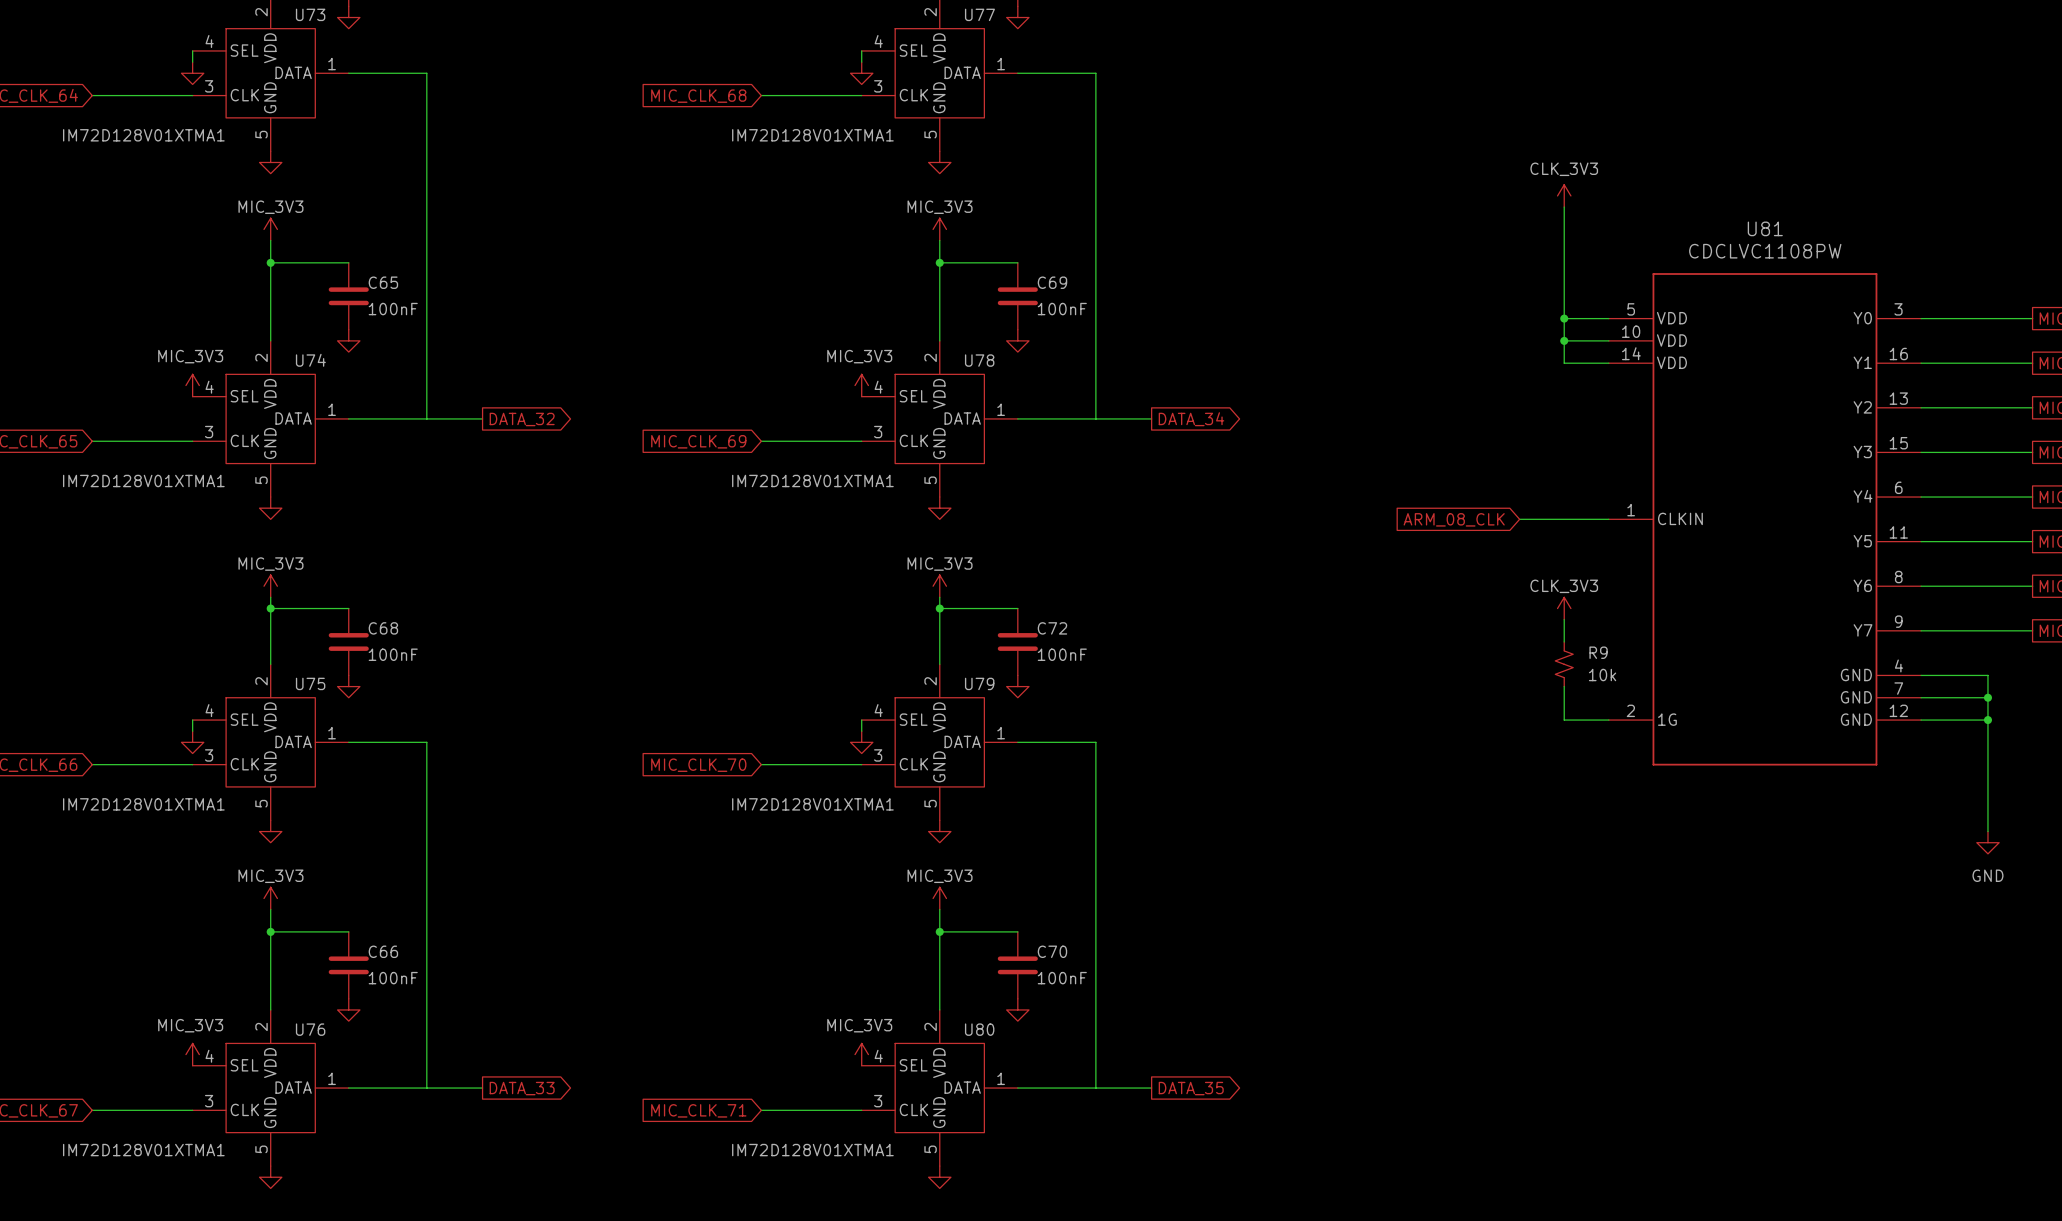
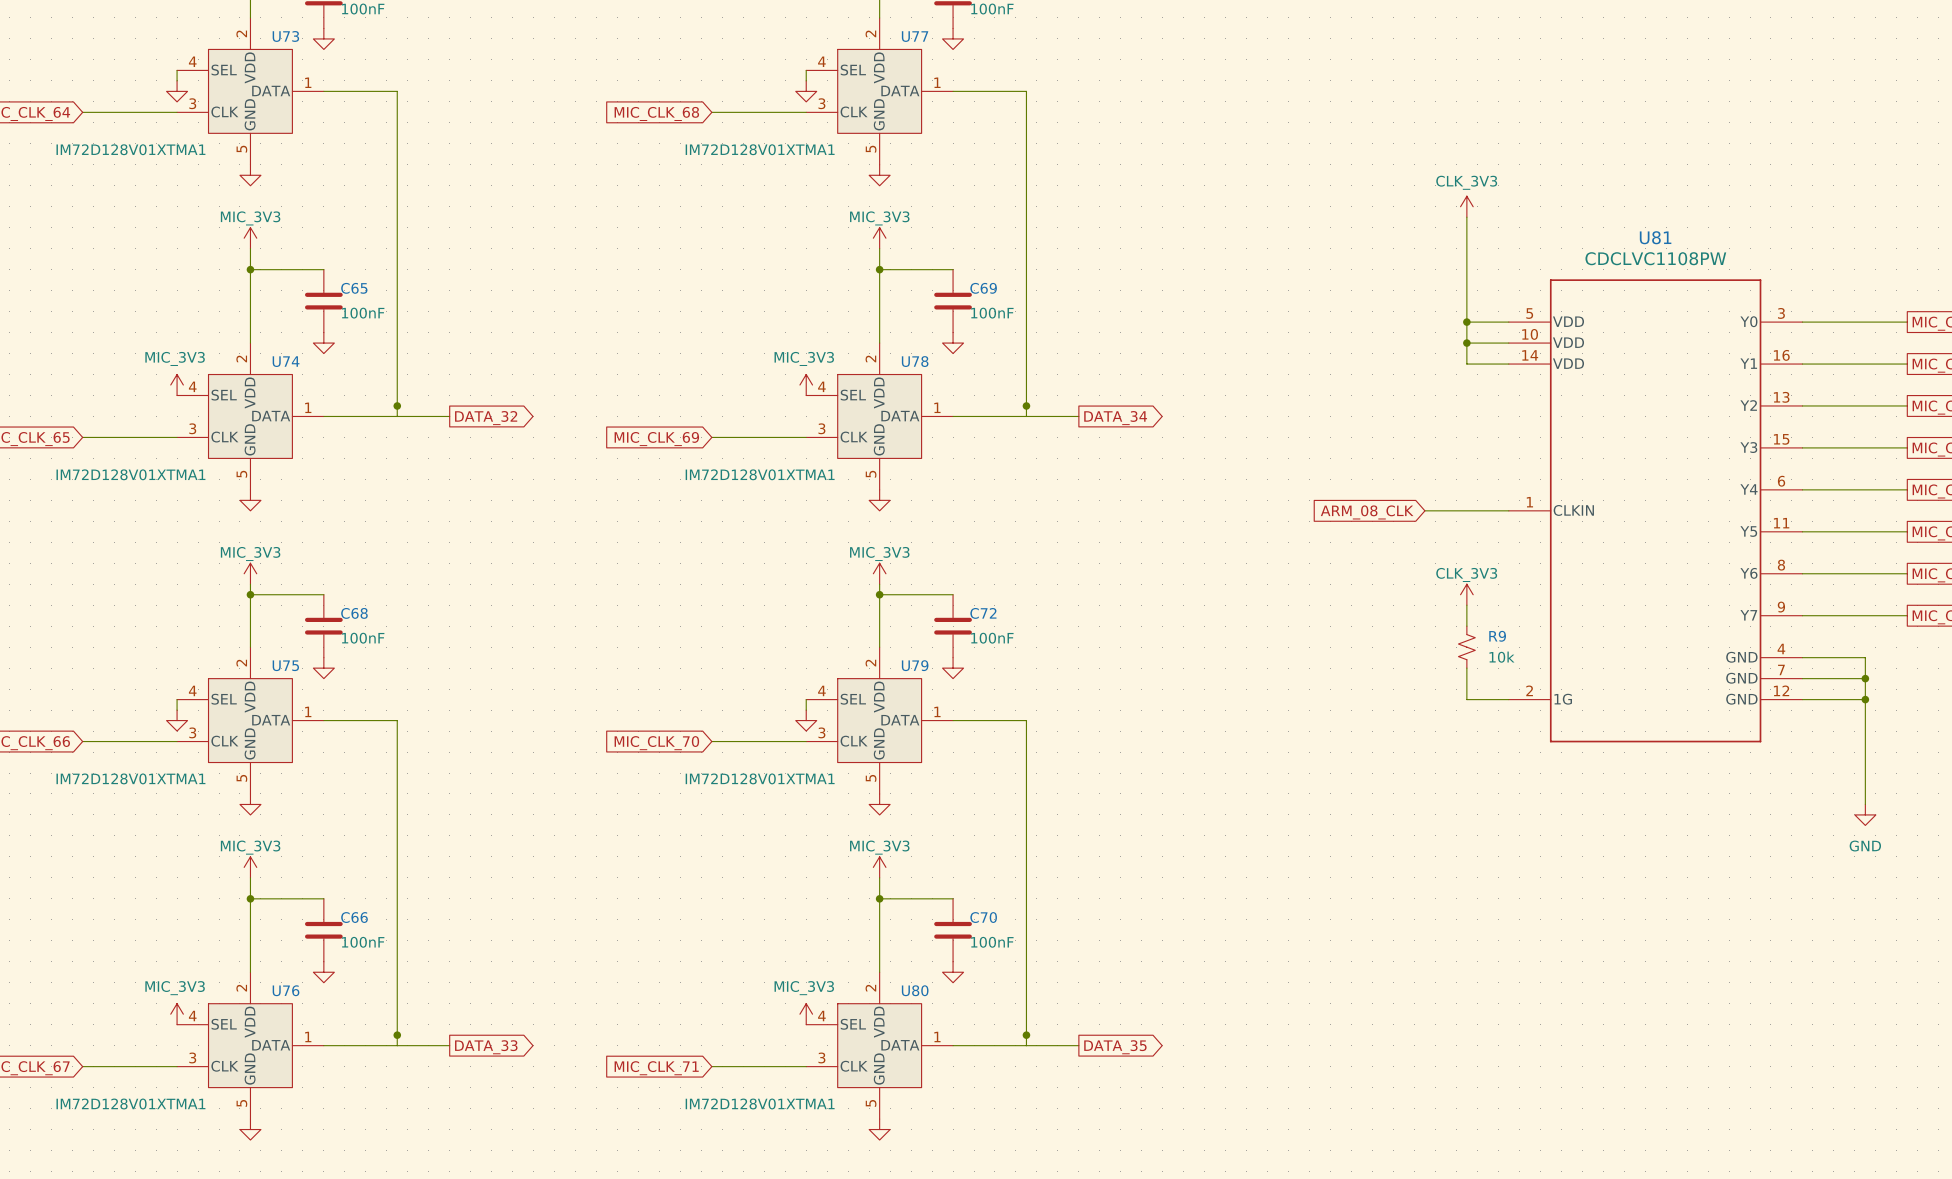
junction: none -> (397, 405)
junction: none -> (1026, 405)
junction: none -> (397, 1035)
junction: none -> (1026, 1035)

